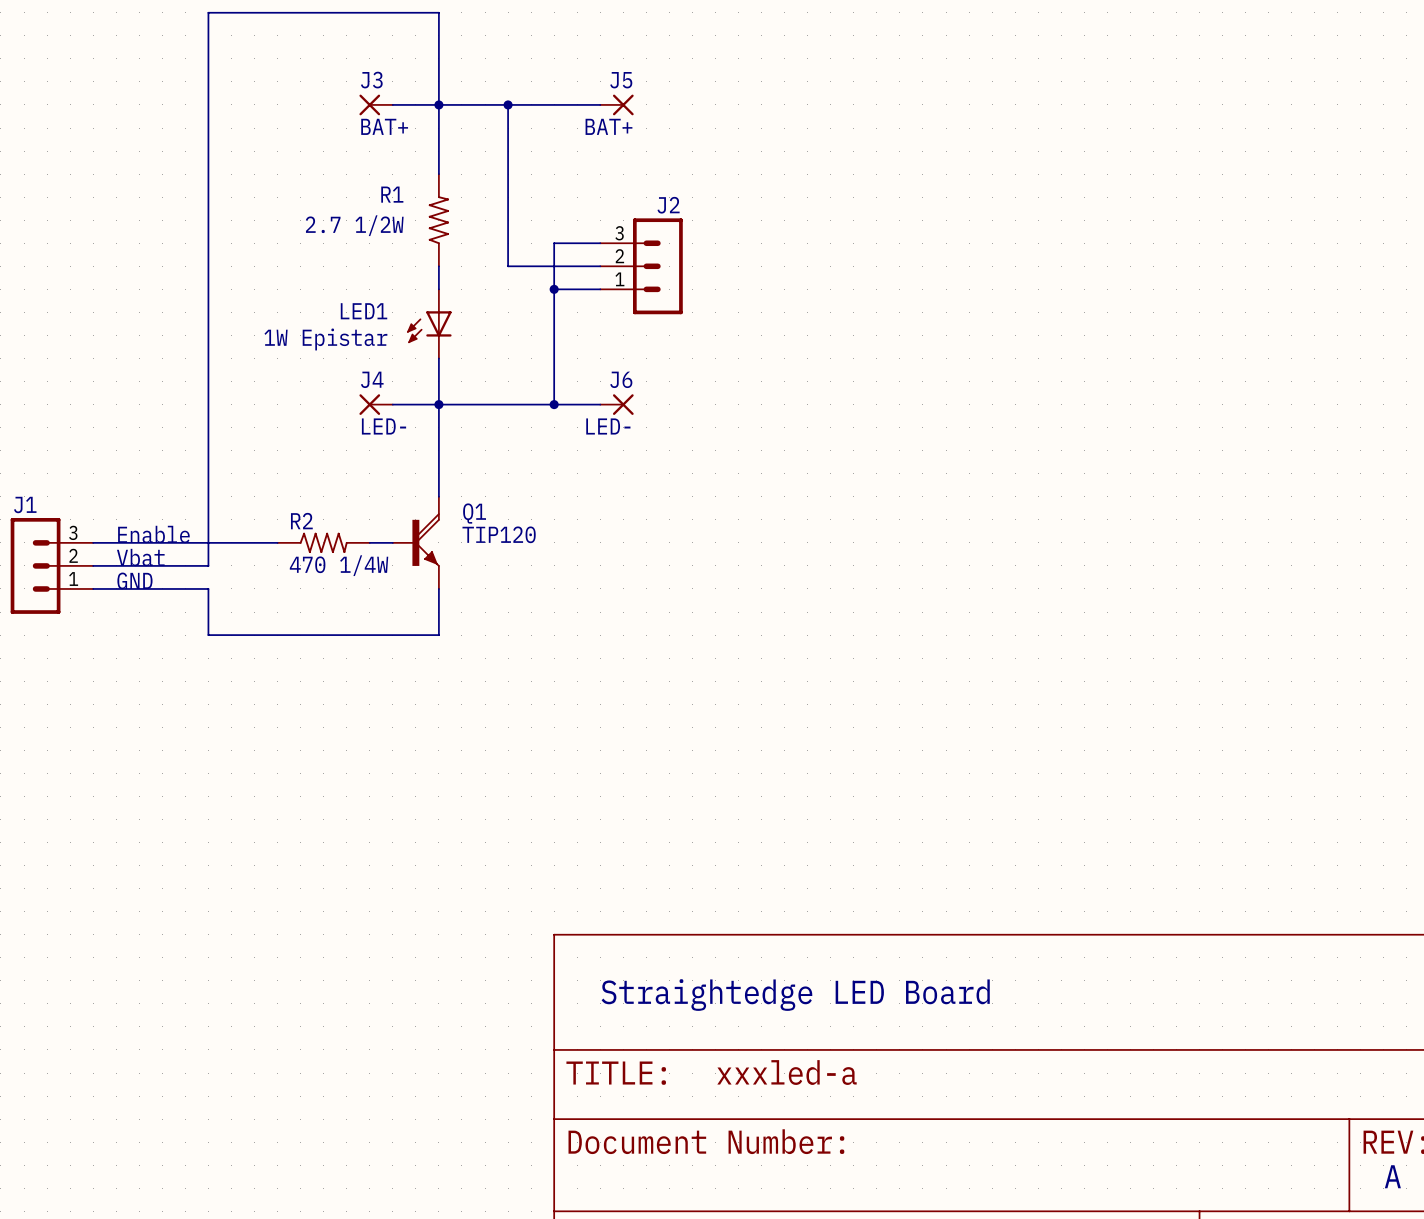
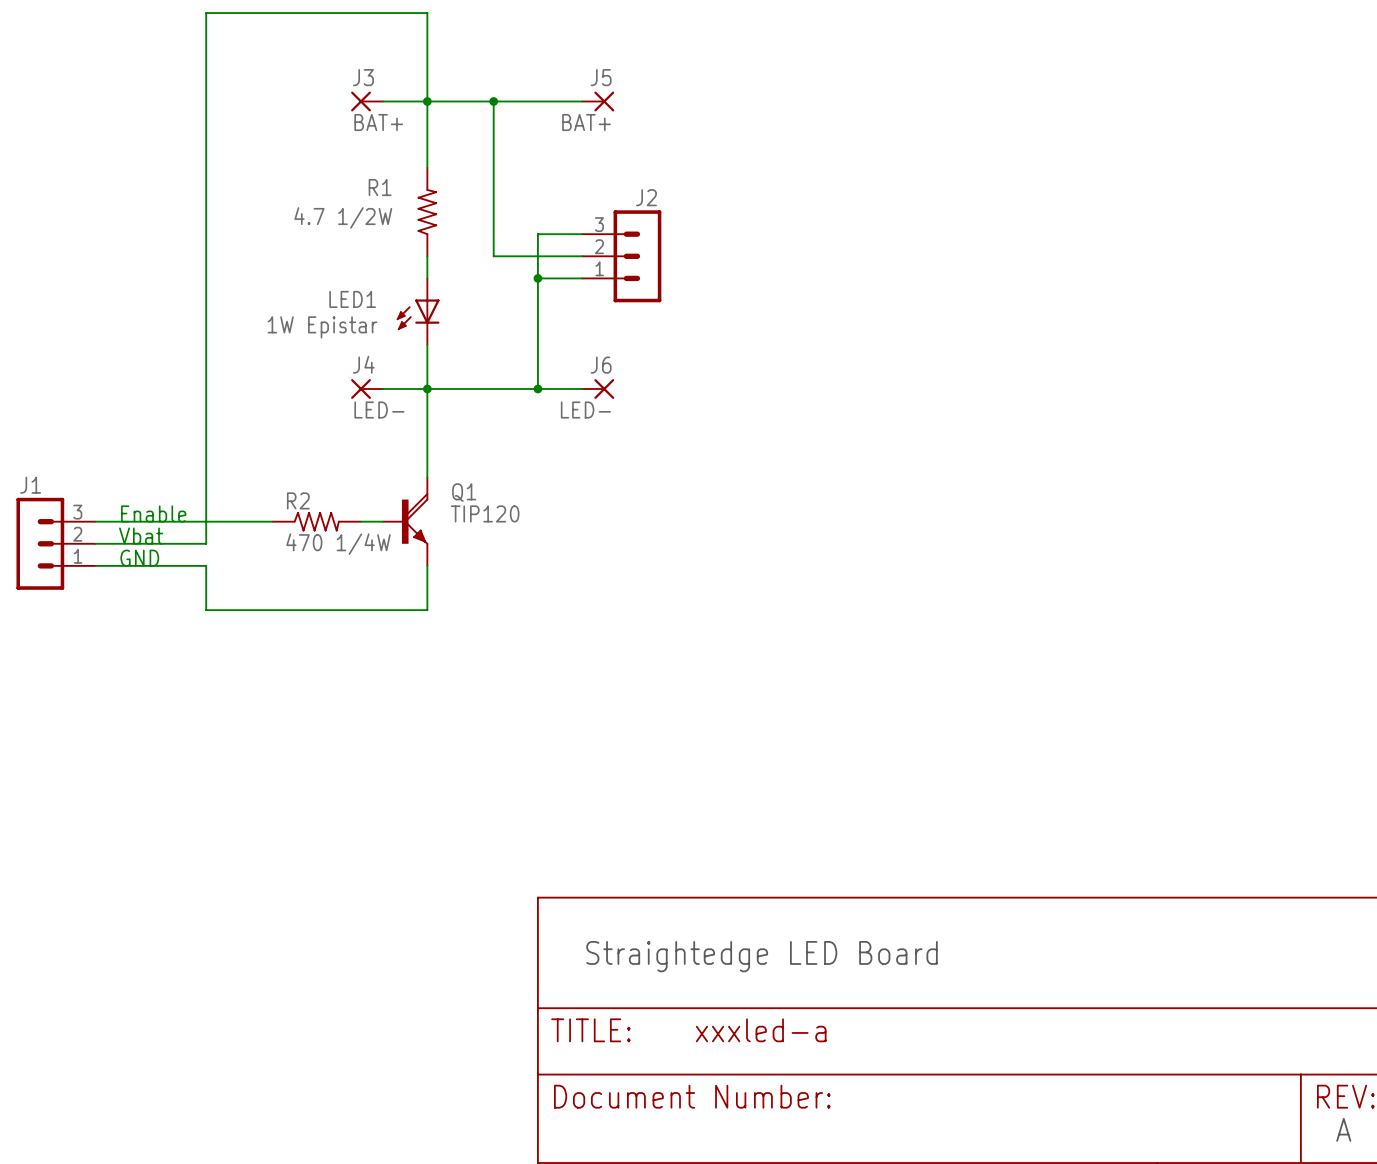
R1 value: 2.7 1/2W (354, 225) -> 4.7 1/2W (343, 217)

